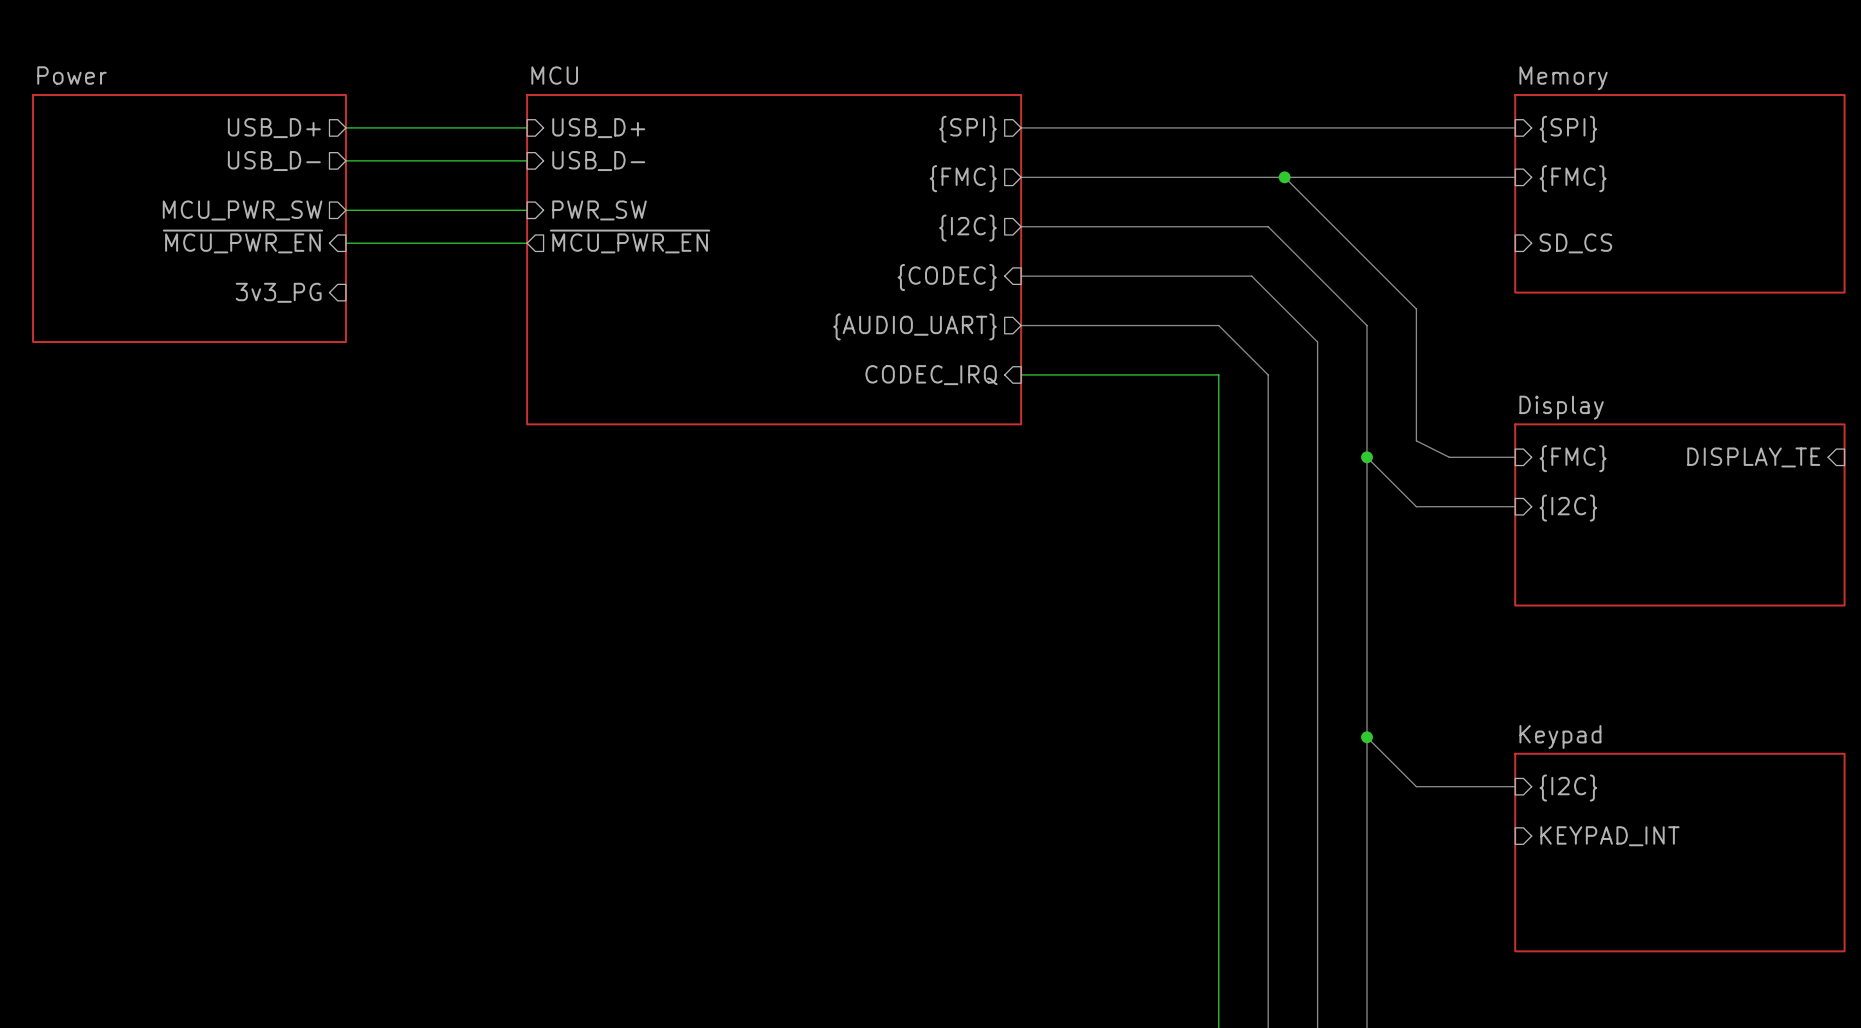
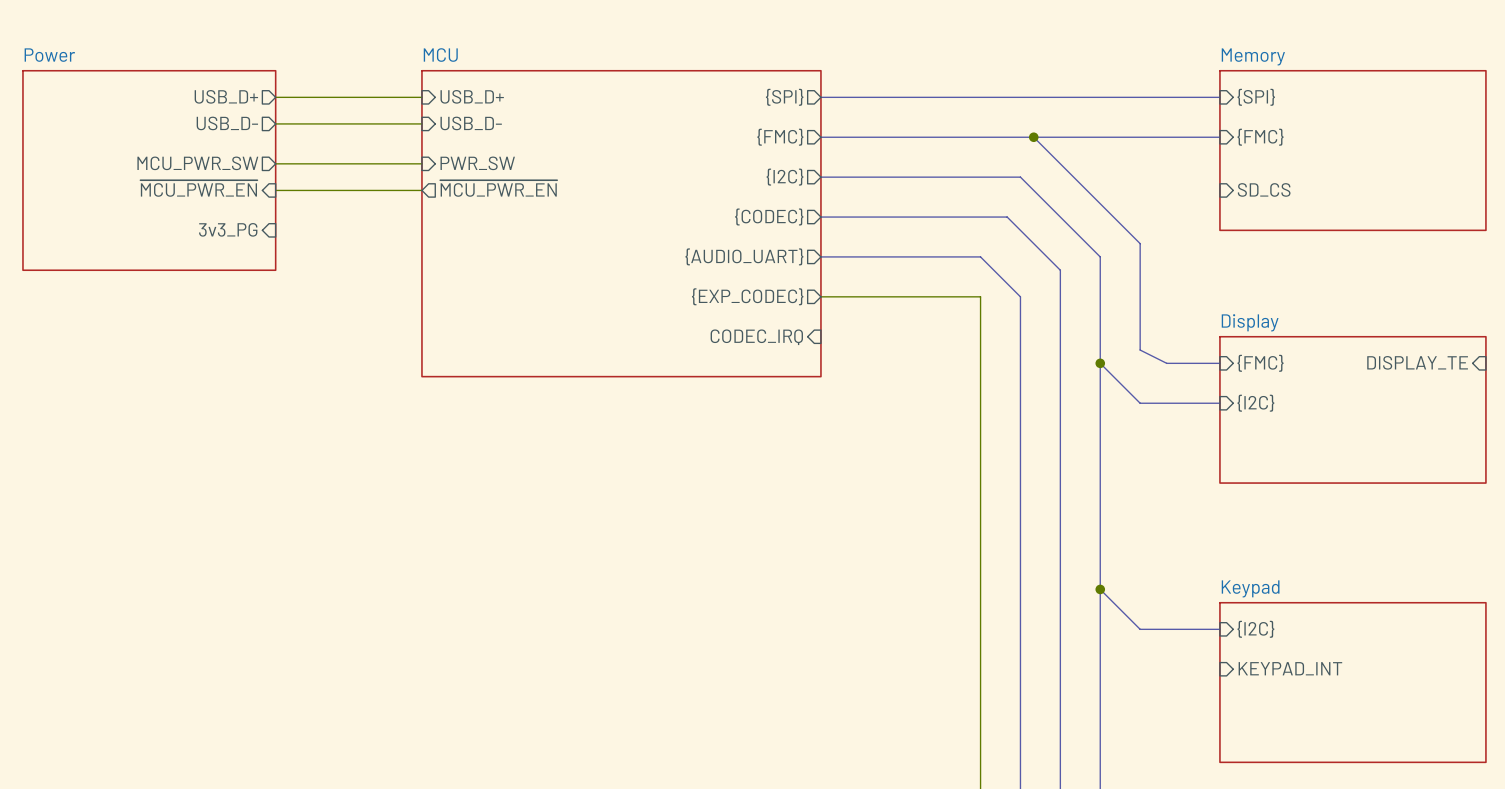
sheet MCU: (774, 259) -> none
sheet pin shape: input (947, 277) -> output (769, 216)
sheet MCU: none -> (621, 223)
sheet pin shape: input (931, 375) -> output (747, 296)
sheet pin: CODEC_IRQ (931, 375) -> {EXP_CODEC} (747, 296)
sheet pin: none -> CODEC_IRQ (756, 337)

